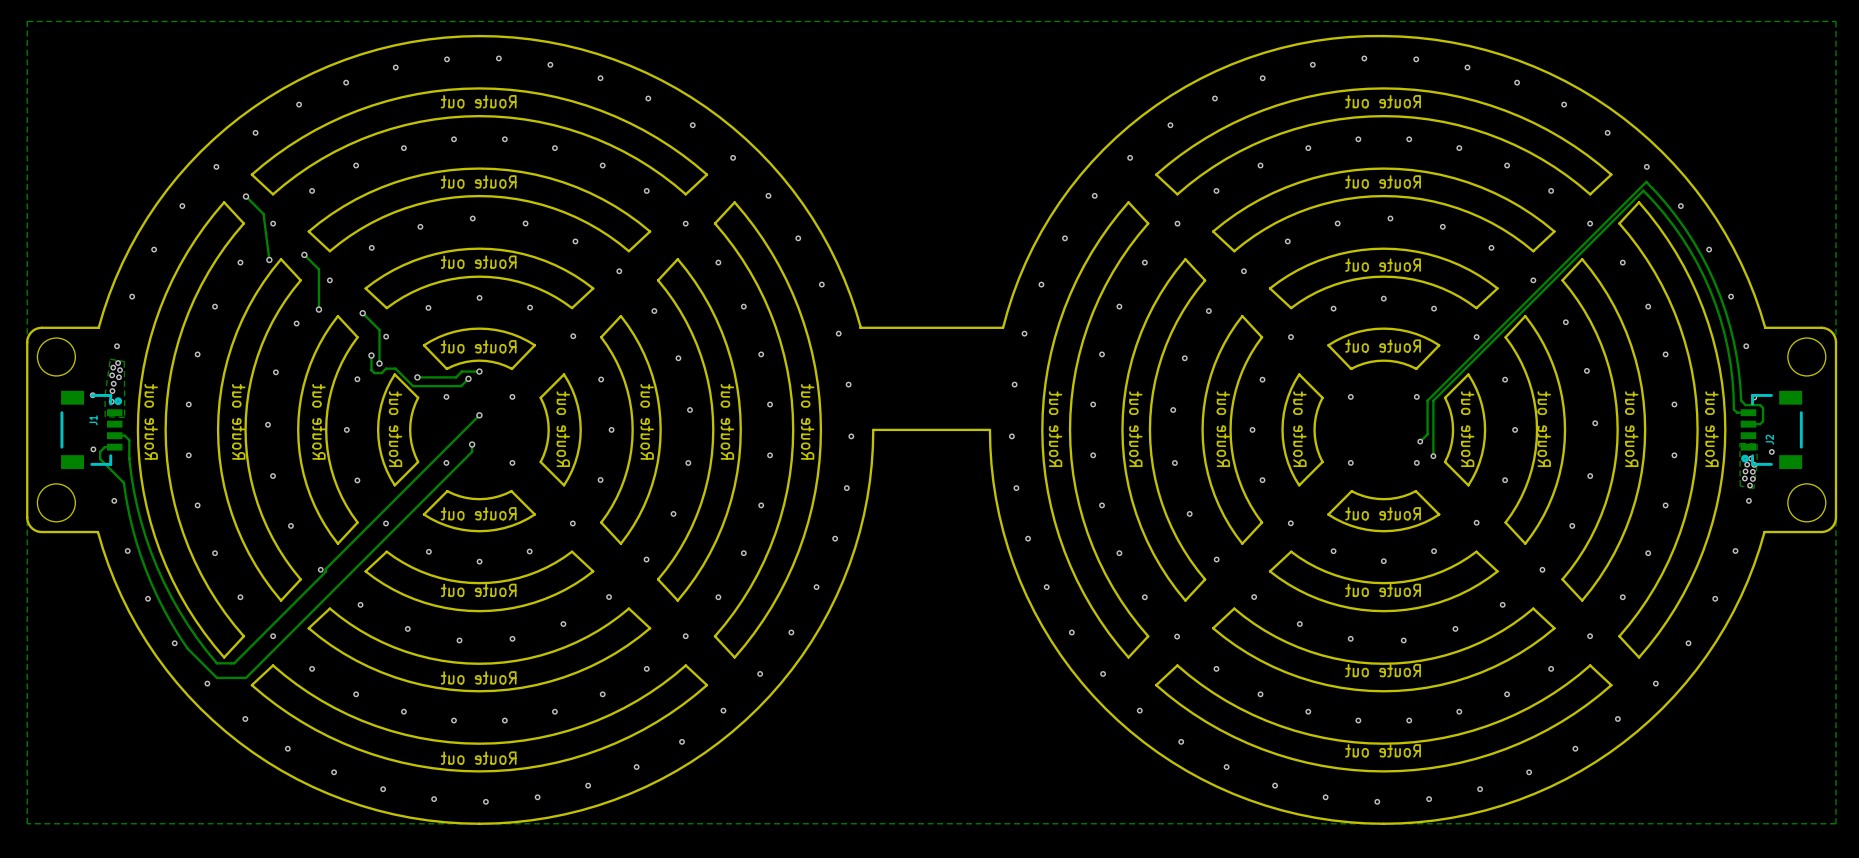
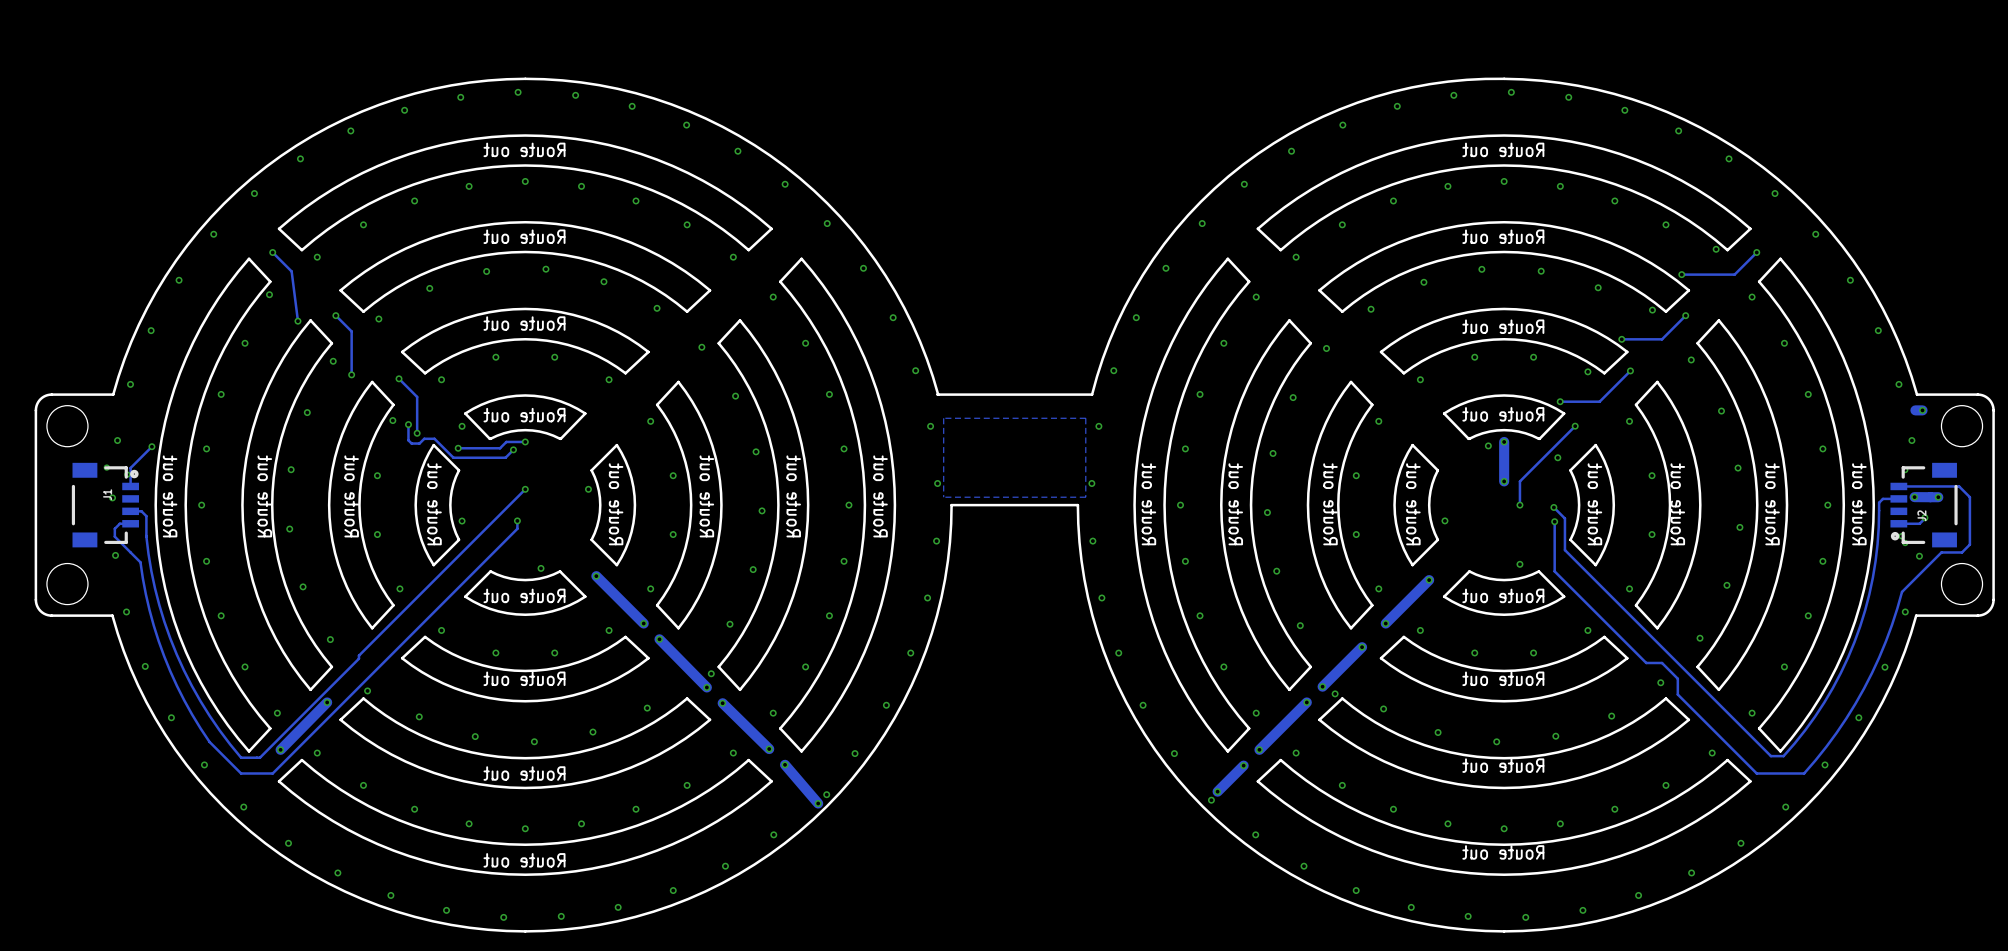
zone outline: (1835, 21) (27, 21) (27, 823) (1835, 823) (1835, 21) -> none
via: none -> (518, 92)
via: none -> (1511, 92)
via: none -> (575, 95)
via: none -> (1453, 95)
via: none -> (460, 97)
via: none -> (1568, 97)
via: (498, 58) -> none
via: (1364, 58) -> none
via: (447, 59) -> none
via: (1416, 59) -> none
via: none -> (632, 106)
via: none -> (1397, 106)
via: (550, 64) -> none
via: (1312, 64) -> none
via: none -> (404, 110)
via: none -> (1624, 110)
via: (395, 67) -> none
via: (1467, 67) -> none
via: (600, 78) -> none
via: none -> (686, 125)
via: none -> (1342, 125)
via: (1262, 78) -> none
via: (346, 82) -> none
via: (1517, 82) -> none
via: none -> (350, 130)
via: none -> (1678, 130)
via: (648, 98) -> none
via: (1214, 98) -> none
via: none -> (737, 151)
via: none -> (1291, 151)
via: (299, 104) -> none
via: (1564, 104) -> none
via: none -> (300, 158)
via: none -> (1729, 158)
via: (692, 125) -> none
via: (1170, 125) -> none
via: none -> (525, 181)
via: none -> (1504, 181)
via: (255, 132) -> none
via: (1607, 132) -> none
via: none -> (785, 184)
via: none -> (1244, 184)
via: none -> (469, 186)
via: none -> (581, 186)
via: none -> (1447, 186)
via: none -> (1560, 186)
via: (453, 139) -> none
via: (504, 139) -> none
via: (1358, 139) -> none
via: (1409, 139) -> none
via: none -> (254, 193)
via: none -> (1775, 193)
via: none -> (414, 200)
via: (403, 148) -> none
via: (554, 148) -> none
via: none -> (636, 200)
via: none -> (1393, 200)
via: (1308, 148) -> none
via: (1459, 148) -> none
via: none -> (1614, 200)
via: (733, 157) -> none
via: (1130, 157) -> none
via: (356, 165) -> none
via: (602, 165) -> none
via: (1260, 165) -> none
via: (1507, 165) -> none
via: (216, 166) -> none
via: (1646, 166) -> none
via: none -> (827, 223)
via: none -> (1202, 223)
via: none -> (363, 224)
via: none -> (687, 224)
via: none -> (1342, 224)
via: none -> (1665, 224)
via: none -> (213, 234)
via: none -> (1815, 234)
via: (312, 190) -> none
via: (646, 190) -> none
via: (1216, 190) -> none
via: (1551, 190) -> none
via: none -> (1716, 249)
via: (768, 195) -> none
via: (1094, 195) -> none
track: none -> (1756, 252) (1734, 274) (1681, 274)
via: none -> (1756, 252)
via: none -> (317, 257)
via: none -> (733, 257)
via: none -> (1296, 257)
via: (182, 206) -> none
via: (1680, 206) -> none
via: none -> (545, 269)
via: none -> (863, 268)
via: none -> (1165, 268)
via: none -> (1481, 269)
via: none -> (1541, 271)
via: none -> (486, 271)
via: none -> (1681, 274)
via: (472, 218) -> none
via: (1390, 218) -> none
via: none -> (179, 280)
via: none -> (1850, 280)
via: (273, 223) -> none
via: (525, 223) -> none
via: none -> (603, 281)
via: (685, 223) -> none
via: (1177, 223) -> none
via: (1337, 223) -> none
via: (1590, 223) -> none
via: none -> (1423, 282)
via: (420, 226) -> none
via: (1442, 226) -> none
via: none -> (429, 288)
via: none -> (1598, 287)
via: none -> (269, 294)
via: none -> (773, 297)
via: none -> (1256, 297)
via: none -> (1752, 297)
via: (798, 238) -> none
via: (1064, 238) -> none
via: (575, 241) -> none
via: (1287, 241) -> none
via: (371, 247) -> none
via: (1491, 247) -> none
via: none -> (657, 308)
via: none -> (1371, 309)
via: (154, 249) -> none
via: none -> (1652, 310)
via: (1709, 249) -> none
track: none -> (1685, 315) (1662, 339) (1621, 339)
via: none -> (1685, 315)
via: none -> (893, 317)
via: none -> (1136, 317)
via: none -> (378, 319)
via: (240, 262) -> none
via: (718, 262) -> none
via: (1144, 262) -> none
via: (1622, 262) -> none
via: none -> (151, 330)
via: none -> (1878, 330)
via: (619, 271) -> none
via: (1243, 271) -> none
via: none -> (1621, 339)
via: none -> (245, 343)
via: (329, 280) -> none
via: none -> (805, 343)
via: none -> (1223, 343)
via: (1533, 280) -> none
via: none -> (1784, 343)
via: none -> (701, 347)
via: (821, 284) -> none
via: (1041, 284) -> none
via: none -> (1326, 348)
via: none -> (495, 357)
via: none -> (554, 357)
via: none -> (1474, 357)
via: none -> (1533, 357)
via: none -> (1691, 359)
via: (132, 296) -> none
via: (1731, 296) -> none
via: none -> (333, 361)
via: (479, 297) -> none
via: (1383, 298) -> none
via: none -> (915, 370)
via: none -> (1113, 370)
track: none -> (1630, 370) (1599, 401) (1560, 401)
via: none -> (1630, 370)
via: (215, 306) -> none
via: (743, 306) -> none
via: (1119, 306) -> none
via: none -> (1587, 371)
via: (1648, 306) -> none
via: (428, 307) -> none
via: (530, 307) -> none
via: (1333, 308) -> none
via: (1434, 308) -> none
via: (654, 311) -> none
via: (1208, 311) -> none
via: none -> (441, 379)
via: none -> (609, 379)
via: none -> (1420, 379)
via: none -> (130, 384)
via: none -> (1898, 384)
via: (1565, 322) -> none
via: (296, 323) -> none
via: none -> (221, 394)
via: none -> (829, 394)
via: none -> (1200, 394)
via: none -> (1808, 394)
via: none -> (735, 396)
via: none -> (1293, 397)
via: (838, 333) -> none
via: (1024, 333) -> none
via: none -> (1560, 401)
via: (386, 336) -> none
via: (573, 336) -> none
via: (1290, 337) -> none
via: (1476, 337) -> none
track: none -> (1922, 410) (1915, 410)
via: none -> (1922, 410)
via: none -> (1721, 411)
via: none -> (307, 412)
via: (116, 346) -> none
via: (1746, 346) -> none
zone outline: none -> (1085, 418) (1085, 497) (943, 497) (943, 418) (1085, 418)
via: none -> (392, 420)
via: none -> (650, 421)
via: none -> (1378, 421)
via: none -> (1629, 421)
via: (197, 354) -> none
via: (761, 354) -> none
via: (1102, 354) -> none
via: (1665, 354) -> none
track: none -> (1575, 426) (1519, 481) (1519, 505)
via: none -> (1575, 426)
via: none -> (462, 426)
via: none -> (930, 426)
via: none -> (1098, 426)
via: (678, 358) -> none
via: (1184, 358) -> none
zone outline: (110, 359) (105, 395) (105, 416) (124, 417) (124, 361) (110, 359) -> none
via: (118, 363) -> none
via: (113, 367) -> none
via: none -> (117, 440)
via: (120, 370) -> none
via: (1586, 370) -> none
via: none -> (1911, 440)
track: none -> (1504, 441) (1504, 481)
via: none -> (1504, 441)
via: (275, 372) -> none
via: (112, 375) -> none
track: none -> (151, 446) (130, 468) (130, 486)
via: none -> (151, 446)
via: none -> (1488, 445)
via: (118, 377) -> none
via: none -> (206, 448)
via: none -> (844, 448)
via: none -> (1185, 448)
via: none -> (1822, 448)
via: (357, 379) -> none
via: (601, 379) -> none
via: (1262, 379) -> none
via: (1505, 379) -> none
via: none -> (756, 451)
via: none -> (1273, 453)
via: (113, 383) -> none
via: (848, 384) -> none
via: (1014, 384) -> none
via: none -> (1557, 457)
via: (112, 391) -> none
via: none -> (1738, 468)
via: (446, 396) -> none
via: (512, 396) -> none
via: (1350, 396) -> none
via: (1416, 396) -> none
via: none -> (291, 469)
track: (1741, 400) (1745, 405) (1760, 405) (1763, 408) (1763, 421) (1760, 424) (1748, 424) -> (1553, 507) (1564, 518) (1564, 550) (1770, 756) (1783, 756) (1815, 716) (1832, 688) (1847, 657) (1865, 610) (1872, 577) (1877, 544) (1879, 502) (1882, 498) (1898, 498)
track: (1741, 400) (1733, 340) (1714, 282) (1685, 228) (1646, 181) (1427, 400) (1427, 434) (1420, 441) -> none
via: none -> (377, 475)
via: none -> (673, 475)
via: none -> (1356, 475)
via: none -> (1652, 475)
via: (188, 404) -> none
via: (770, 404) -> none
via: (1093, 404) -> none
via: (1674, 404) -> none
via: none -> (1504, 481)
via: none -> (937, 483)
via: none -> (1091, 483)
via: (689, 410) -> none
via: (1173, 410) -> none
track: (1748, 412) (1737, 412) (1733, 409) (1728, 349) (1715, 305) (1704, 277) (1673, 225) (1643, 190) (1433, 400) (1433, 456) -> (1898, 486) (1959, 486) (1969, 497) (1969, 544) (1962, 552) (1941, 552) (1902, 591) (1885, 641) (1864, 688) (1836, 732) (1804, 773) (1756, 773) (1677, 694) (1677, 678) (1662, 662) (1646, 662) (1554, 571) (1554, 521)
via: none -> (588, 489)
track: none -> (1914, 497) (1938, 497)
via: none -> (1914, 497)
via: none -> (1938, 497)
via: none -> (112, 497)
via: (1595, 423) -> none
via: (267, 424) -> none
via: none -> (201, 505)
via: (346, 429) -> none
via: (611, 429) -> none
via: none -> (848, 505)
via: none -> (1180, 505)
via: (1252, 429) -> none
via: none -> (1519, 505)
via: (1515, 429) -> none
via: none -> (1827, 505)
via: none -> (1553, 507)
via: none -> (762, 510)
via: (851, 436) -> none
via: (1011, 436) -> none
via: none -> (1267, 512)
via: (1420, 441) -> none
track: none -> (1924, 517) (1919, 523) (1898, 523)
via: none -> (1924, 517)
zone outline: (1739, 443) (1740, 485) (1753, 488) (1757, 465) (1756, 444) (1739, 443) -> none
via: none -> (462, 521)
via: none -> (1444, 520)
via: none -> (1554, 521)
via: (93, 449) -> none
via: none -> (1739, 527)
via: (1771, 451) -> none
via: none -> (289, 529)
via: (188, 455) -> none
via: (770, 455) -> none
via: (1093, 455) -> none
via: (1674, 455) -> none
via: (1433, 456) -> none
via: none -> (377, 534)
via: none -> (673, 534)
via: none -> (1356, 534)
via: none -> (1652, 534)
via: (446, 462) -> none
via: (512, 462) -> none
via: (1350, 462) -> none
via: (1416, 462) -> none
via: (688, 463) -> none
via: none -> (936, 541)
via: none -> (1092, 541)
via: (1174, 463) -> none
via: (1747, 464) -> none
via: (1745, 471) -> none
via: (1752, 471) -> none
via: none -> (115, 555)
via: (273, 476) -> none
via: (1590, 476) -> none
via: none -> (1919, 556)
via: (1744, 478) -> none
via: (1752, 478) -> none
via: (357, 480) -> none
via: (600, 480) -> none
via: (1262, 480) -> none
via: (1505, 480) -> none
via: none -> (206, 561)
via: none -> (844, 561)
via: none -> (1185, 561)
via: none -> (1822, 561)
via: none -> (1519, 564)
via: (1750, 485) -> none
via: none -> (541, 568)
via: (846, 488) -> none
via: (1016, 488) -> none
via: none -> (753, 569)
via: none -> (1276, 571)
track: none -> (596, 576) (643, 623)
via: none -> (596, 576)
track: none -> (1429, 580) (1385, 623)
via: none -> (1429, 580)
via: (114, 500) -> none
via: (1748, 500) -> none
via: none -> (1726, 585)
via: (197, 505) -> none
via: none -> (303, 586)
via: (761, 505) -> none
via: (1102, 505) -> none
via: (1665, 505) -> none
via: none -> (399, 588)
via: none -> (650, 588)
via: none -> (1378, 588)
via: none -> (1629, 588)
via: (673, 513) -> none
via: (1189, 513) -> none
via: none -> (927, 597)
via: none -> (1101, 597)
via: (1476, 522) -> none
via: (386, 523) -> none
via: (572, 523) -> none
via: (1290, 523) -> none
via: (290, 525) -> none
via: (1572, 525) -> none
via: none -> (126, 611)
via: none -> (1905, 611)
via: none -> (221, 615)
via: none -> (829, 615)
via: none -> (1200, 615)
via: none -> (1808, 615)
via: (835, 538) -> none
via: (1028, 538) -> none
via: none -> (643, 623)
via: none -> (729, 624)
via: none -> (1385, 623)
via: none -> (1300, 625)
via: none -> (441, 630)
via: none -> (609, 630)
via: none -> (1420, 630)
via: none -> (1587, 630)
via: (127, 551) -> none
via: (428, 551) -> none
via: (529, 551) -> none
via: (1333, 551) -> none
via: (1434, 551) -> none
via: (1735, 551) -> none
via: none -> (1700, 638)
via: (215, 553) -> none
track: none -> (659, 639) (706, 687)
via: none -> (659, 639)
via: (743, 553) -> none
via: (1119, 553) -> none
via: (1648, 553) -> none
via: none -> (330, 639)
via: (646, 559) -> none
via: (1216, 559) -> none
via: (479, 561) -> none
track: none -> (1362, 647) (1322, 686)
via: none -> (1362, 647)
via: (1383, 561) -> none
via: none -> (495, 652)
via: none -> (554, 652)
via: none -> (910, 653)
via: none -> (1118, 653)
via: none -> (1474, 652)
via: none -> (1533, 652)
via: (320, 569) -> none
via: (1542, 569) -> none
via: none -> (145, 666)
via: none -> (245, 666)
via: none -> (805, 666)
via: none -> (1223, 666)
via: none -> (1784, 666)
via: none -> (1884, 667)
via: none -> (711, 673)
via: (816, 587) -> none
via: (1046, 587) -> none
via: none -> (1660, 682)
via: (240, 597) -> none
via: (609, 597) -> none
via: (718, 597) -> none
via: (1144, 597) -> none
via: none -> (1322, 686)
via: (1254, 597) -> none
via: (1622, 597) -> none
via: (148, 598) -> none
via: none -> (706, 687)
via: (1715, 598) -> none
via: none -> (367, 690)
via: (360, 604) -> none
via: none -> (1335, 693)
via: (1502, 604) -> none
track: none -> (327, 702) (280, 749)
via: none -> (327, 702)
track: none -> (722, 703) (769, 749)
via: none -> (722, 703)
track: none -> (1306, 702) (1259, 749)
via: none -> (1306, 702)
via: none -> (886, 705)
via: none -> (1143, 705)
via: none -> (647, 708)
via: none -> (1383, 708)
via: none -> (277, 713)
via: none -> (773, 713)
via: none -> (1256, 713)
via: none -> (1752, 713)
via: (563, 624) -> none
via: (1299, 624) -> none
via: none -> (1611, 716)
via: none -> (419, 716)
via: none -> (171, 717)
via: none -> (1858, 717)
via: (407, 628) -> none
via: (1455, 628) -> none
via: (791, 632) -> none
via: (1071, 632) -> none
via: (273, 636) -> none
via: (685, 636) -> none
via: (1177, 636) -> none
via: (1590, 636) -> none
via: (512, 638) -> none
via: (1350, 638) -> none
via: none -> (592, 732)
via: (459, 640) -> none
via: none -> (1438, 732)
via: (1403, 640) -> none
via: (174, 643) -> none
via: none -> (475, 736)
via: none -> (1555, 736)
via: (1688, 643) -> none
via: none -> (534, 741)
via: none -> (1496, 741)
via: none -> (769, 749)
via: none -> (280, 749)
via: none -> (1259, 749)
via: none -> (317, 753)
via: none -> (733, 753)
via: none -> (1296, 753)
via: none -> (1712, 753)
via: none -> (855, 753)
via: none -> (1174, 753)
via: (312, 668) -> none
via: (646, 668) -> none
via: (1216, 668) -> none
via: (1551, 668) -> none
via: none -> (204, 764)
track: none -> (785, 764) (818, 803)
via: none -> (785, 764)
via: none -> (1825, 764)
track: none -> (1243, 765) (1217, 791)
via: none -> (1243, 765)
via: (760, 673) -> none
via: (1103, 673) -> none
via: (207, 683) -> none
via: (1655, 683) -> none
via: none -> (363, 785)
via: none -> (687, 785)
via: none -> (1342, 785)
via: none -> (1665, 785)
via: (356, 694) -> none
via: (602, 694) -> none
via: none -> (1217, 791)
via: (1260, 694) -> none
via: (1507, 694) -> none
via: none -> (826, 794)
via: none -> (1211, 800)
via: none -> (818, 803)
via: none -> (243, 807)
via: none -> (1785, 807)
via: none -> (414, 809)
via: none -> (636, 809)
via: (723, 710) -> none
via: (1139, 710) -> none
via: none -> (1393, 809)
via: none -> (1614, 809)
via: (403, 711) -> none
via: (554, 711) -> none
via: (1308, 711) -> none
via: (1459, 711) -> none
via: (245, 718) -> none
via: (1617, 718) -> none
via: (453, 720) -> none
via: (504, 720) -> none
via: (1358, 720) -> none
via: (1409, 720) -> none
via: none -> (469, 823)
via: none -> (581, 823)
via: none -> (1447, 823)
via: none -> (1560, 823)
via: none -> (525, 828)
via: none -> (1504, 828)
via: none -> (773, 834)
via: none -> (1255, 834)
via: (682, 741) -> none
via: (1181, 741) -> none
via: none -> (288, 843)
via: none -> (1740, 843)
via: (287, 748) -> none
via: (1575, 748) -> none
via: none -> (725, 866)
via: none -> (1304, 866)
via: (636, 767) -> none
via: (1226, 767) -> none
via: none -> (337, 872)
via: none -> (1691, 872)
via: (334, 772) -> none
via: (1529, 772) -> none
via: (588, 785) -> none
via: (1275, 785) -> none
via: none -> (673, 890)
via: none -> (1356, 890)
via: (383, 789) -> none
via: (1480, 789) -> none
via: none -> (390, 895)
via: none -> (1638, 895)
via: (537, 797) -> none
via: (1325, 797) -> none
via: (434, 799) -> none
via: (1429, 799) -> none
via: (485, 801) -> none
via: none -> (618, 907)
via: none -> (1411, 907)
via: (1377, 801) -> none
via: none -> (446, 910)
via: none -> (1582, 910)
via: none -> (561, 916)
via: none -> (1468, 916)
via: none -> (503, 917)
via: none -> (1525, 917)

